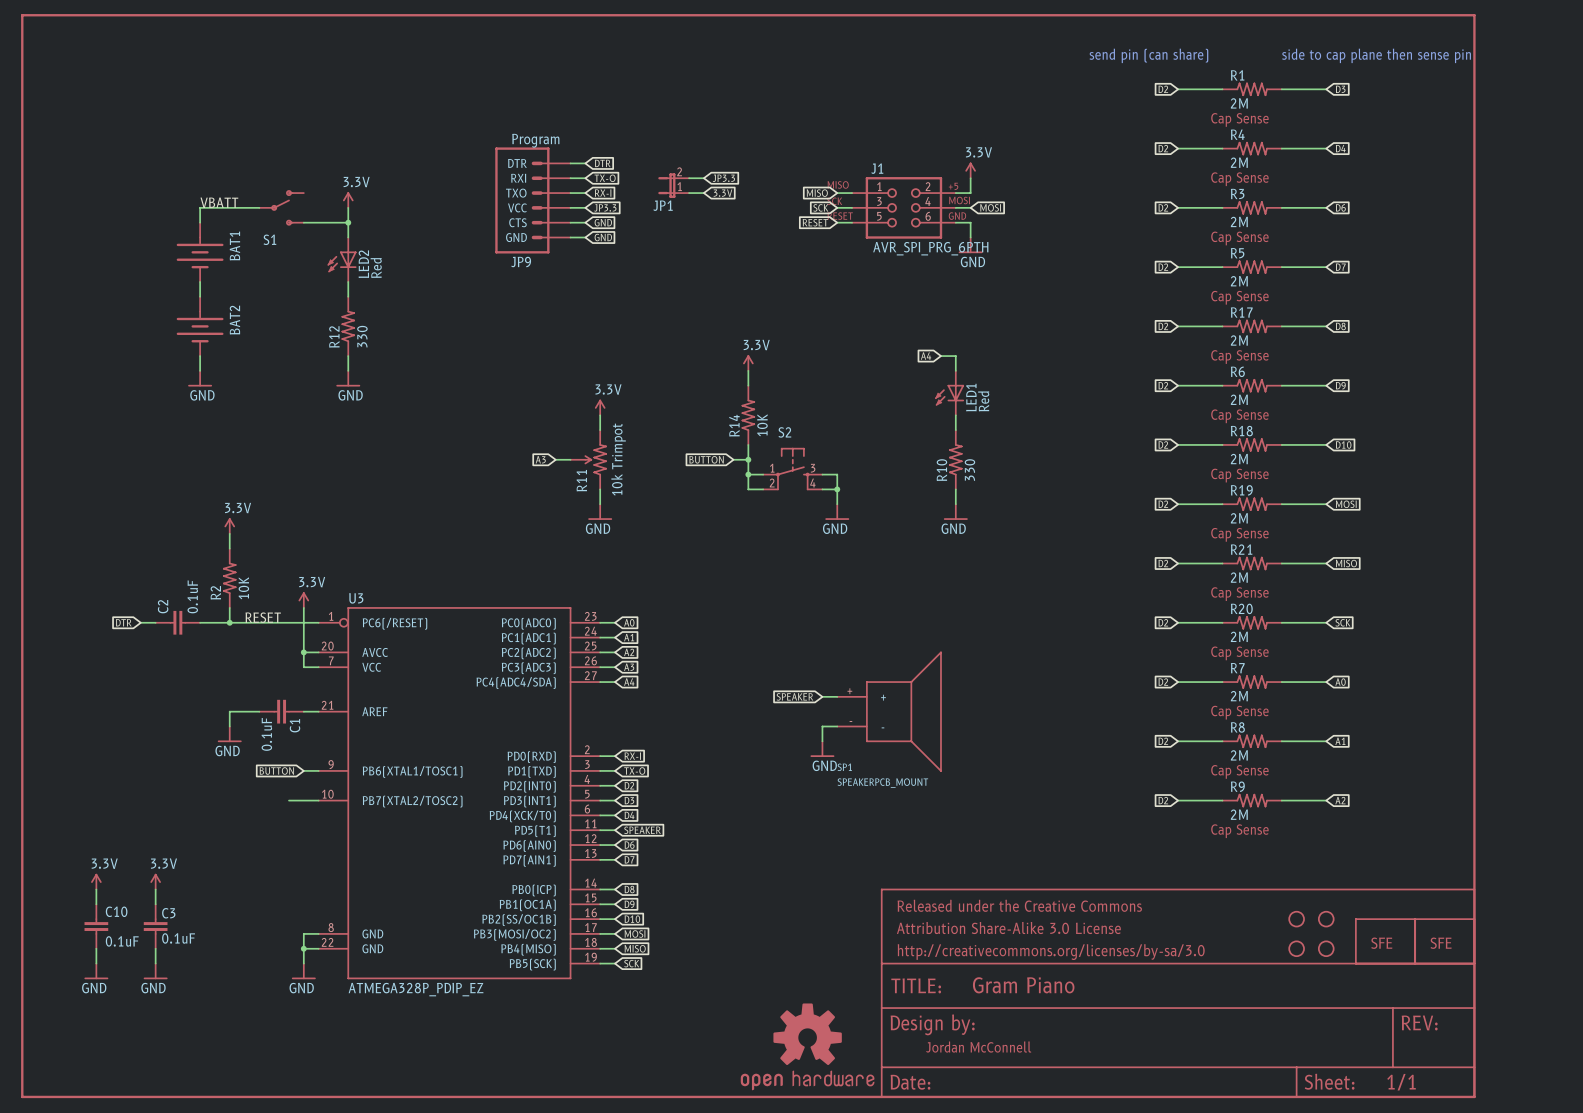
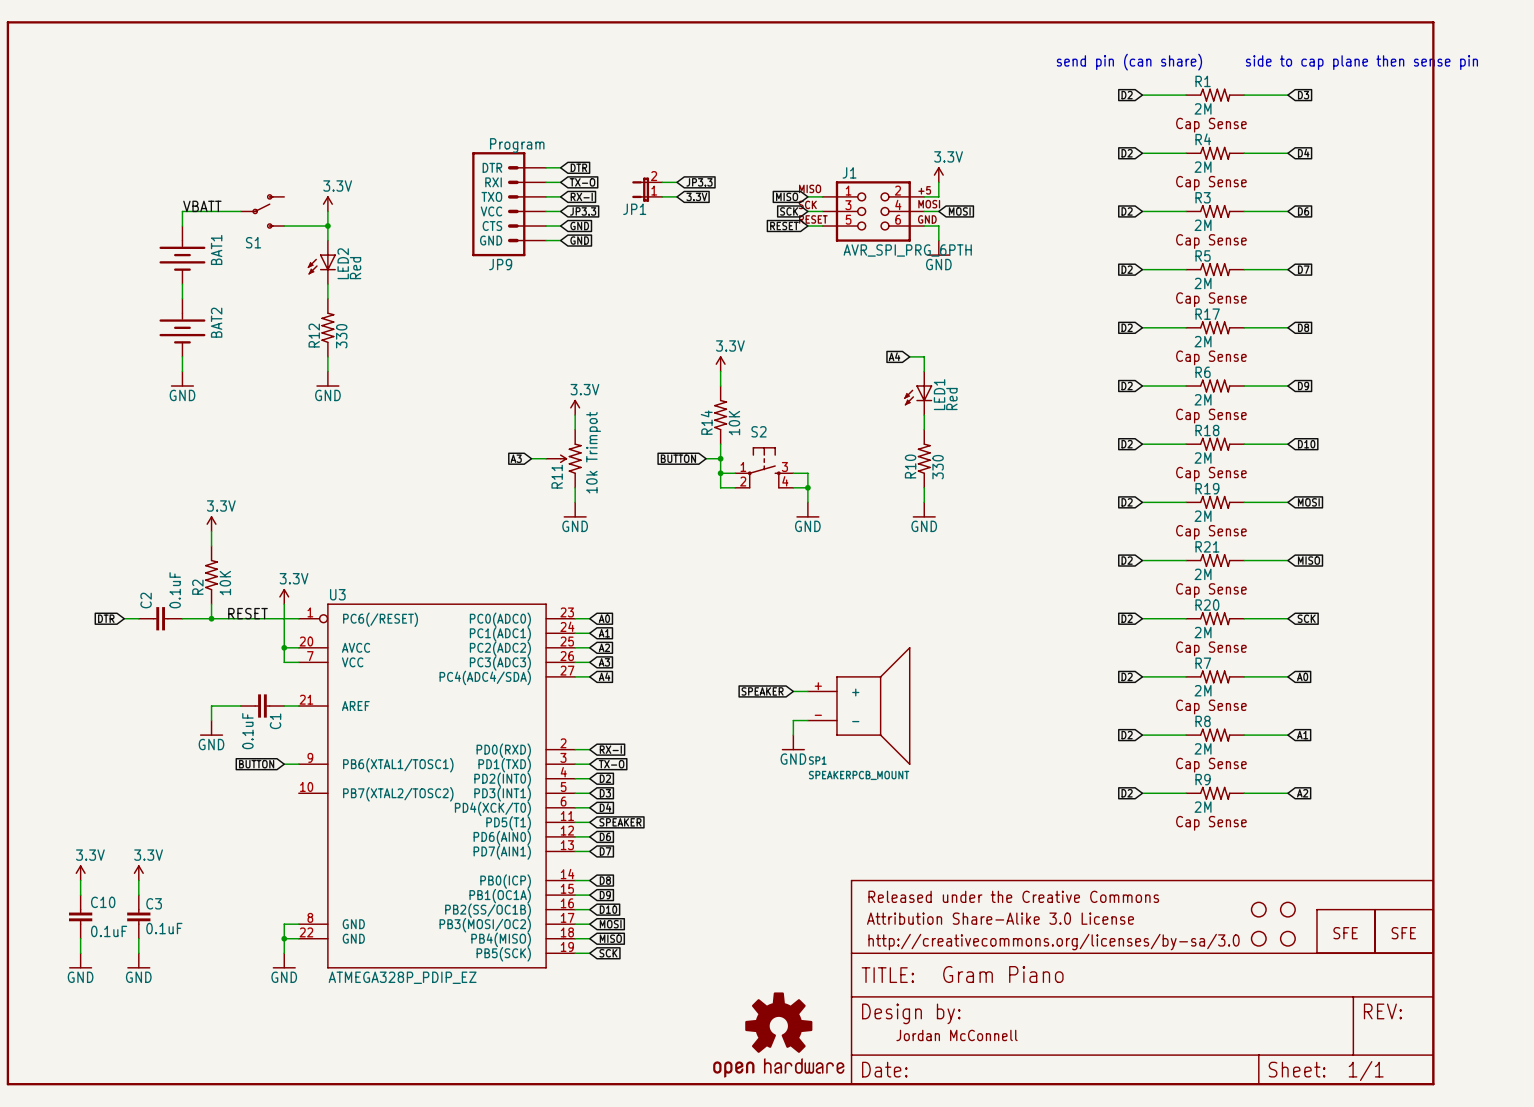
wire: (289, 800) (318, 800) -> none

